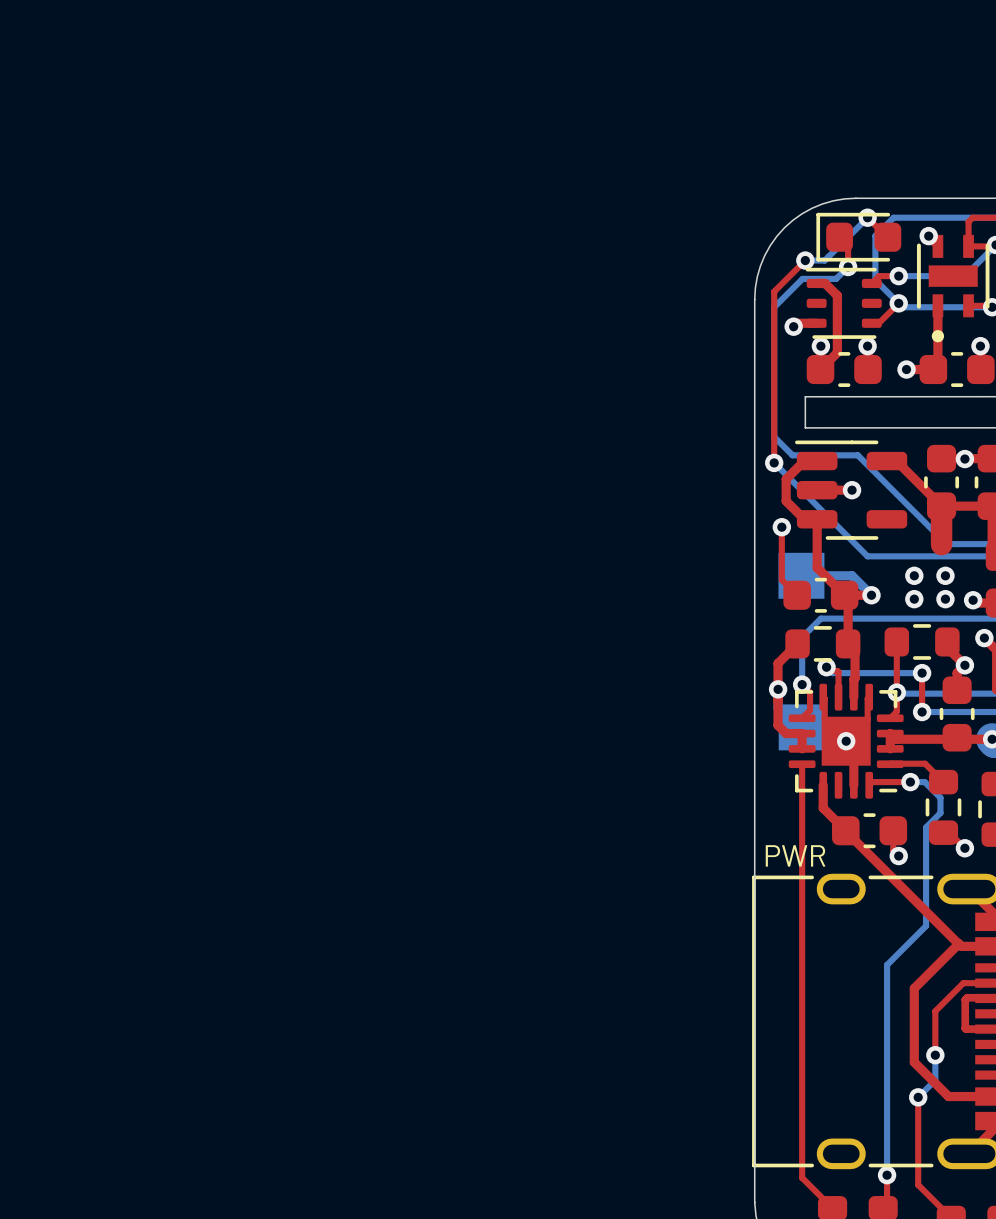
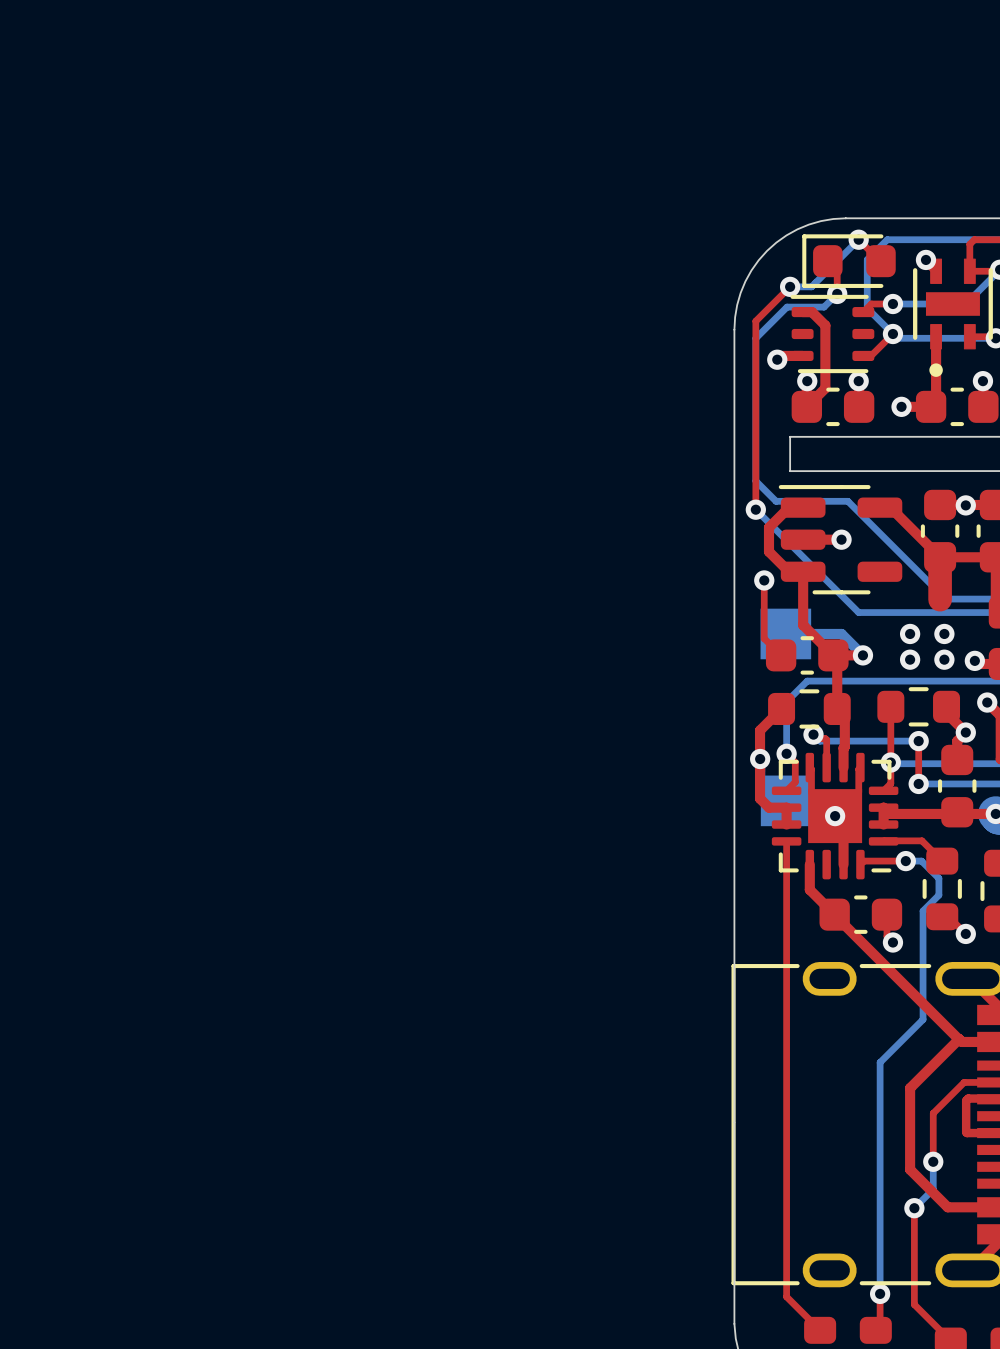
text: PWR (795, 855) -> none

